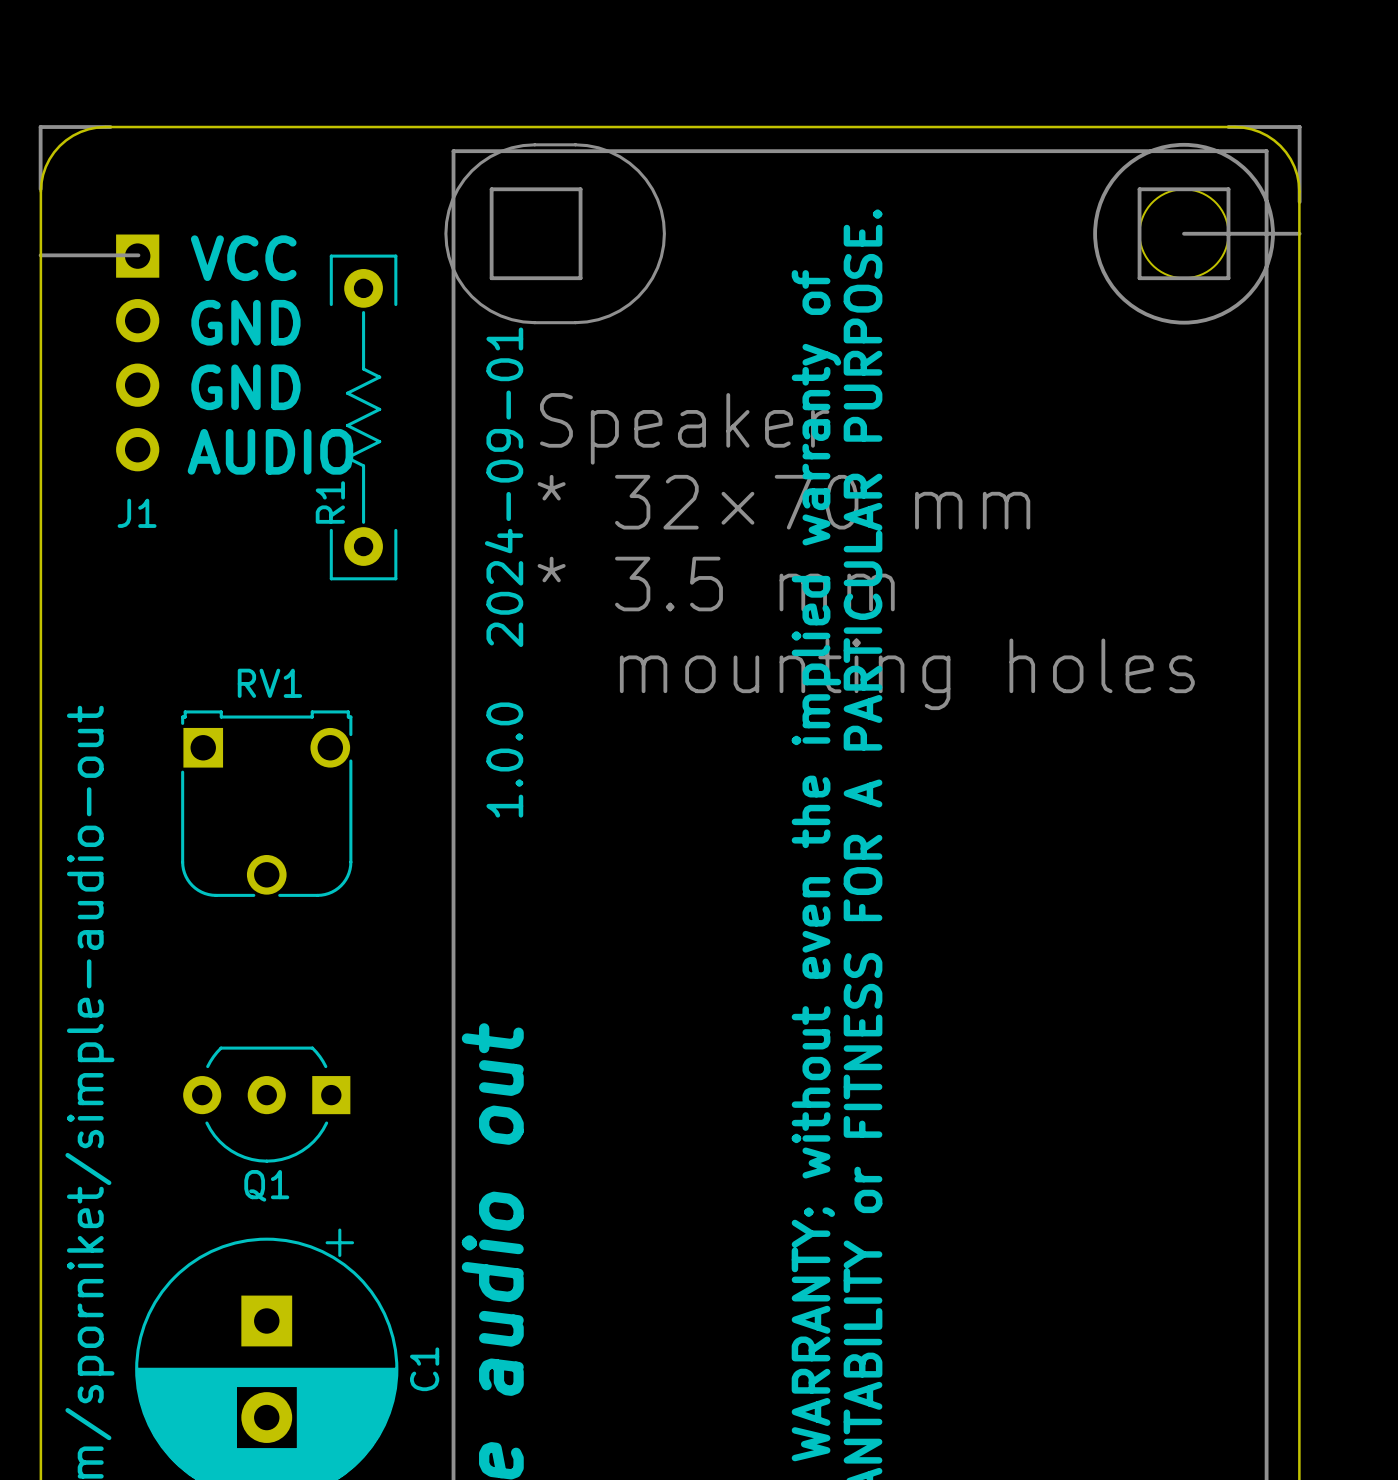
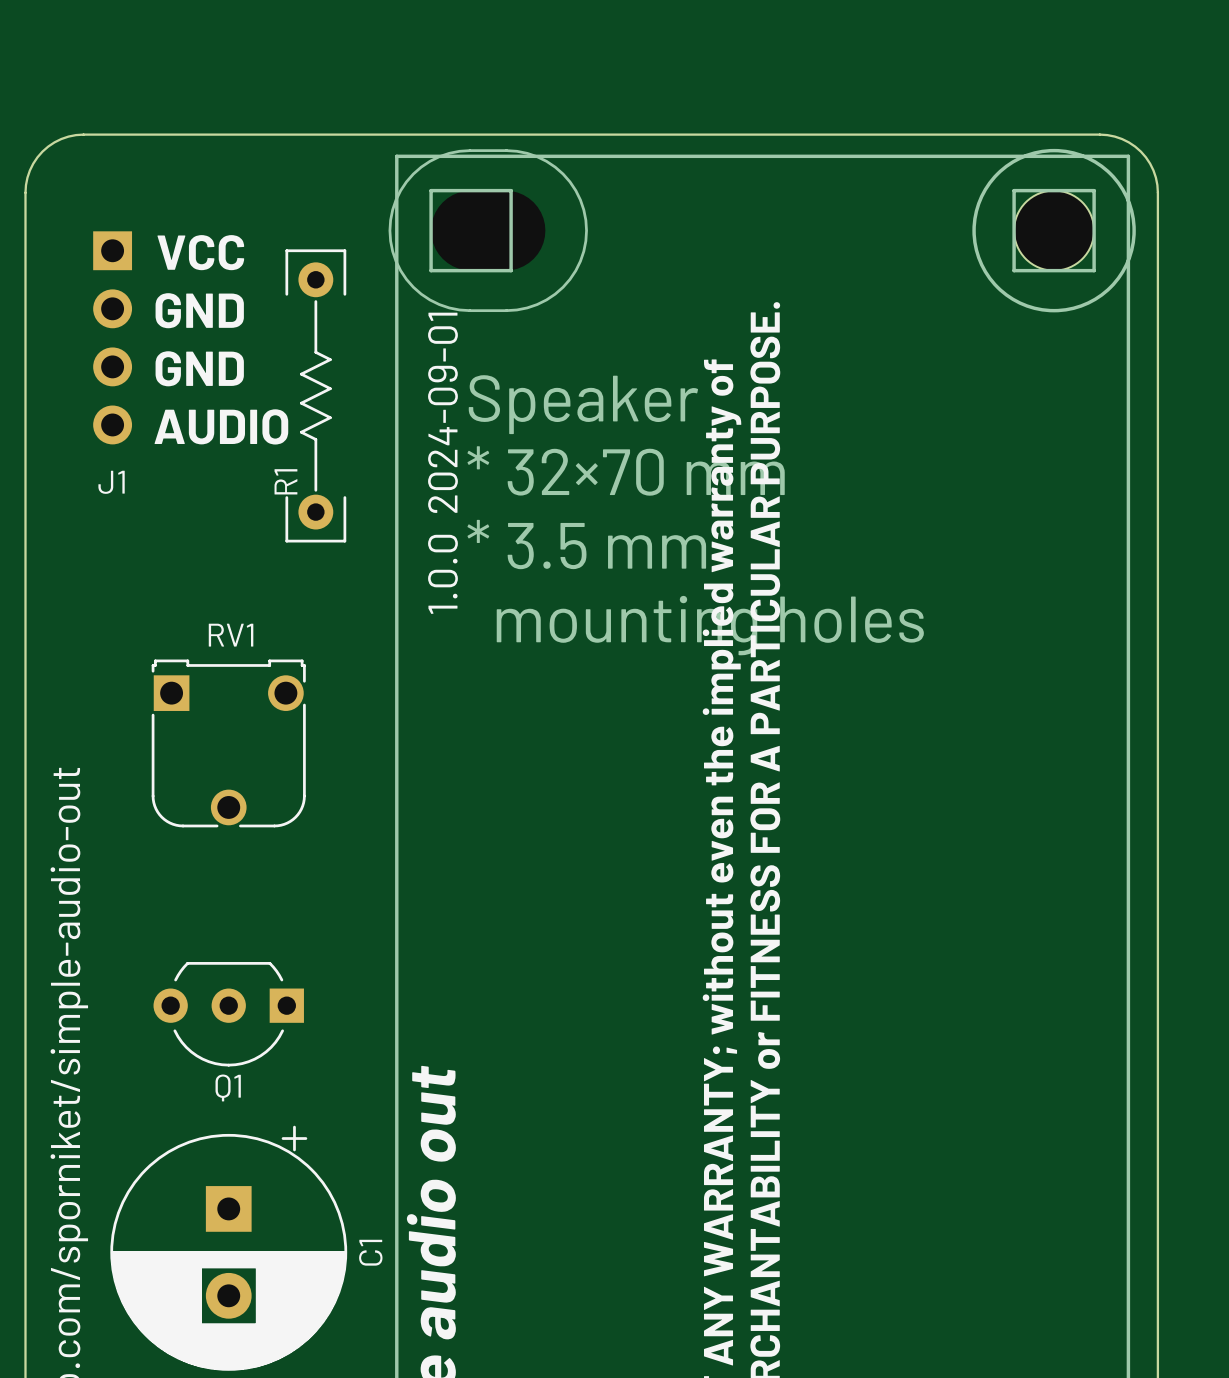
line: (110, 127) (40, 127) (40, 189) -> none
line: (1228, 127) (1299, 127) (1299, 201) -> none
line: (1184, 233) (1299, 233) -> none
line: (40, 255) (138, 255) -> none

